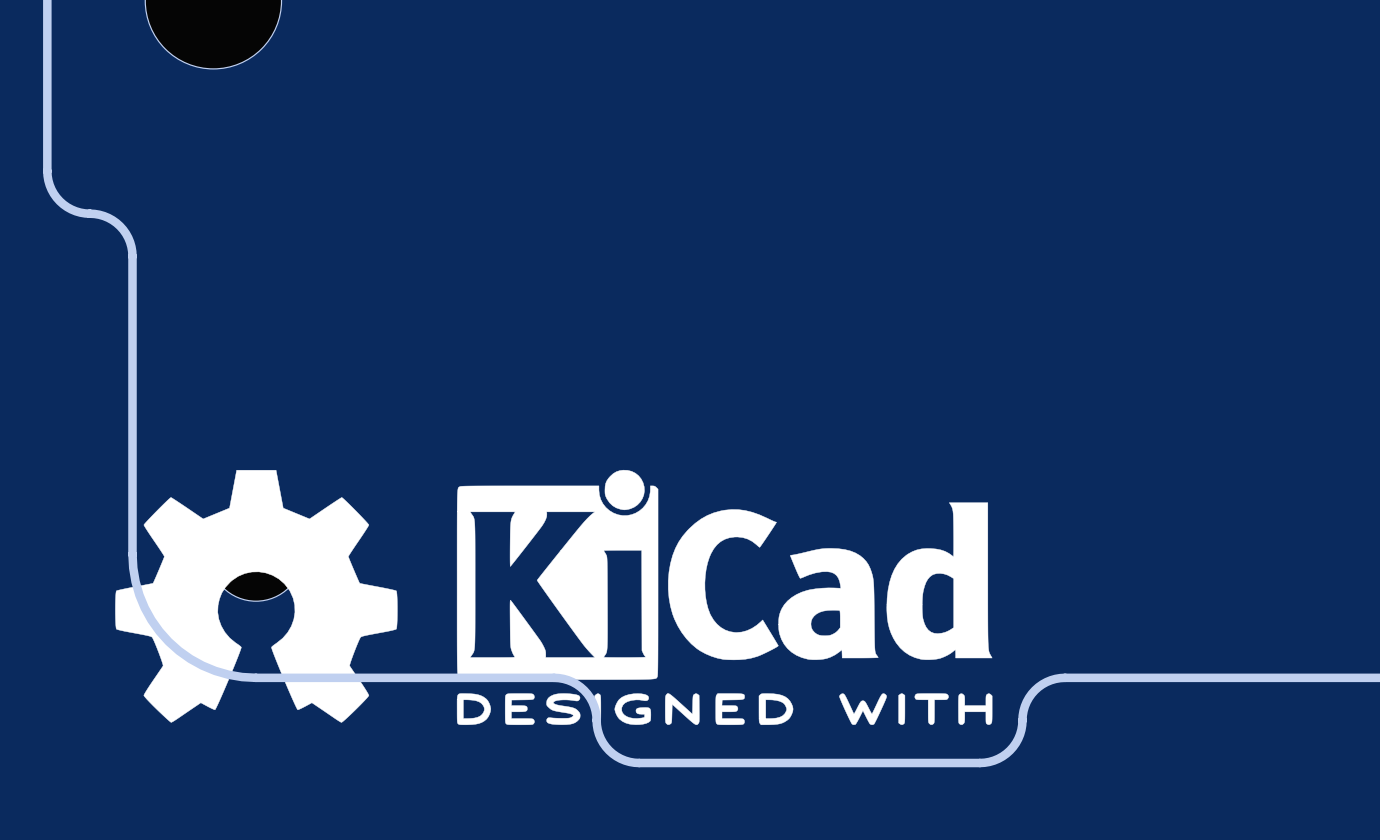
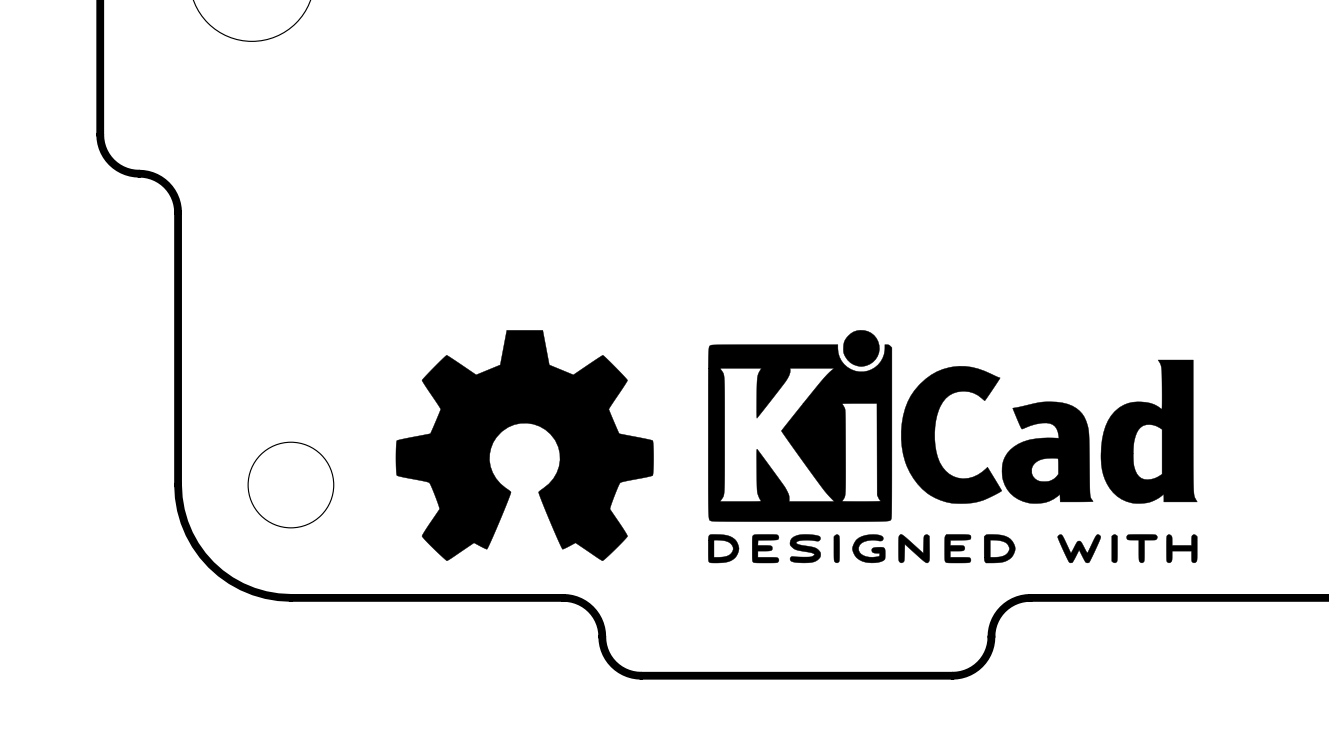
drawing position: (256, 596) -> (524, 445)
drawing position: (724, 597) -> (952, 446)

